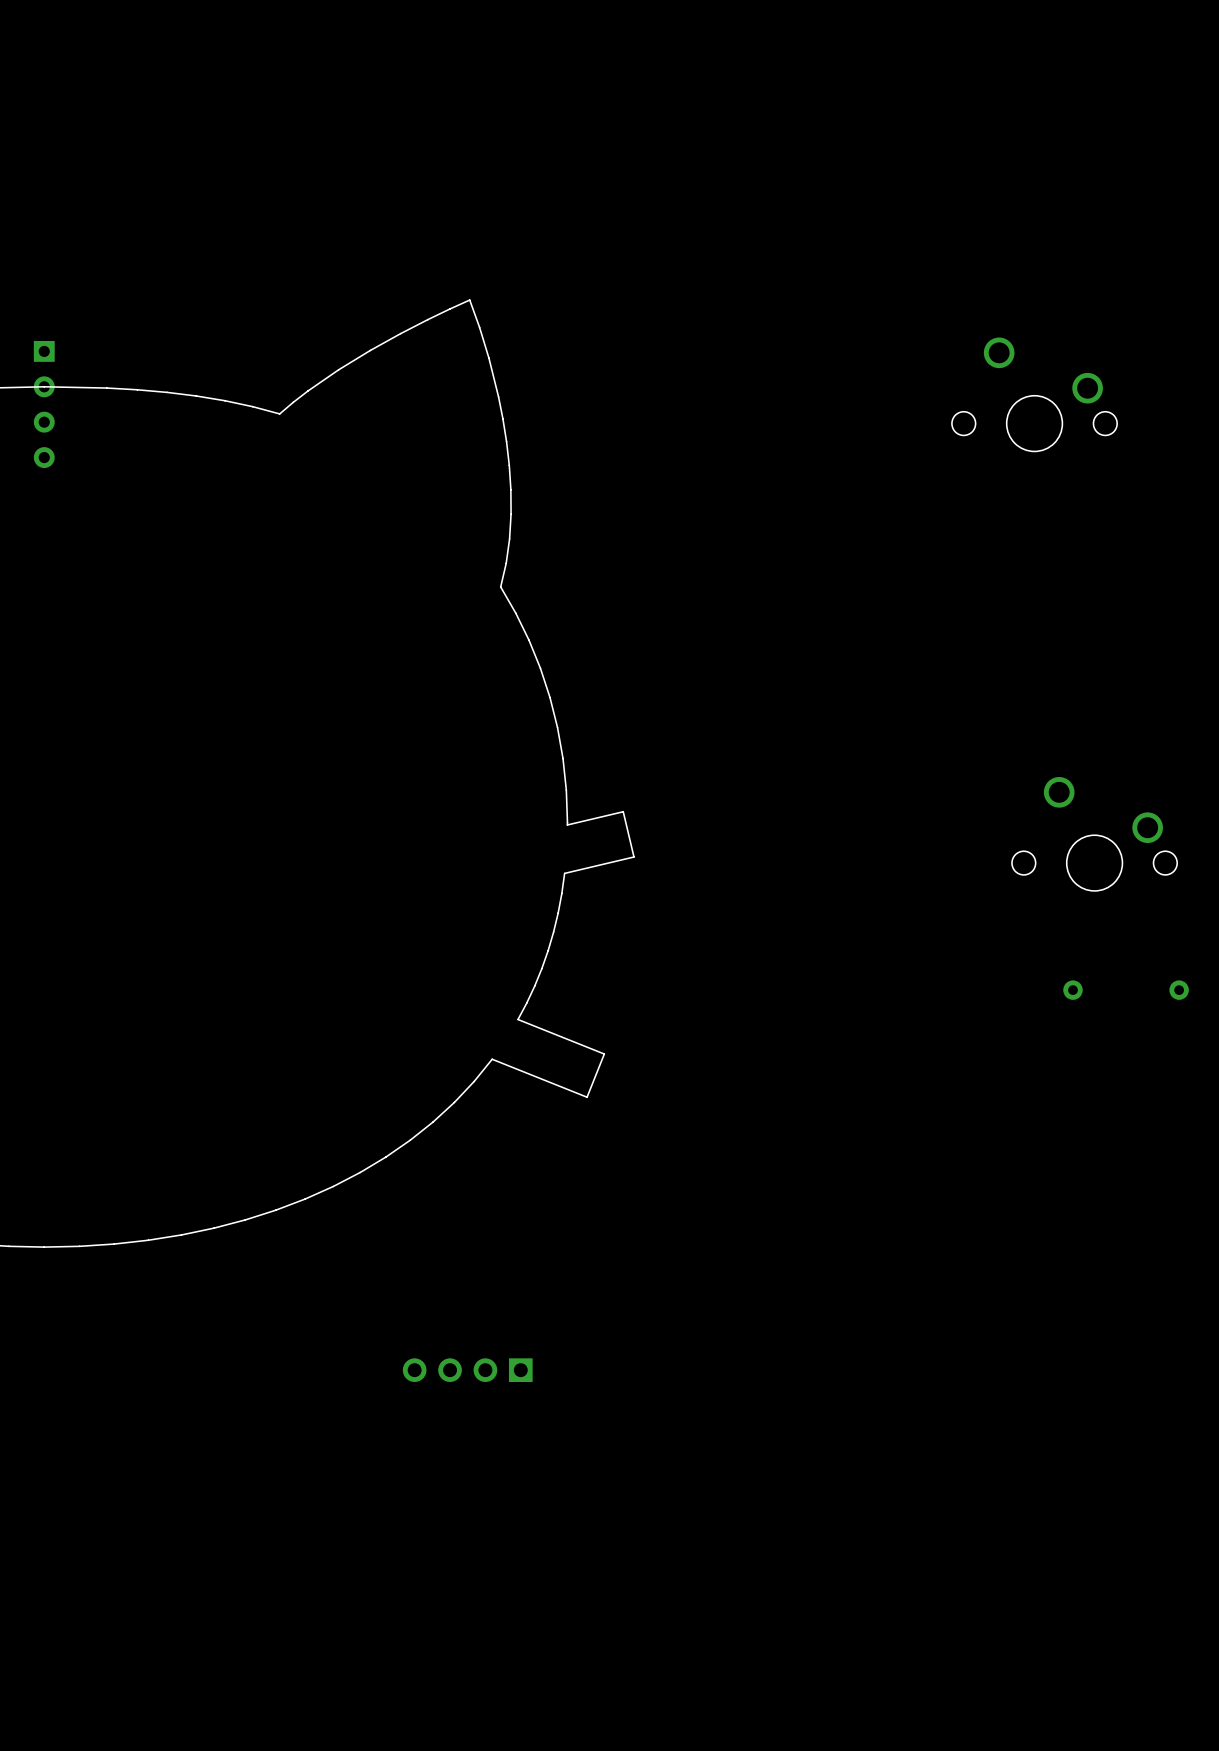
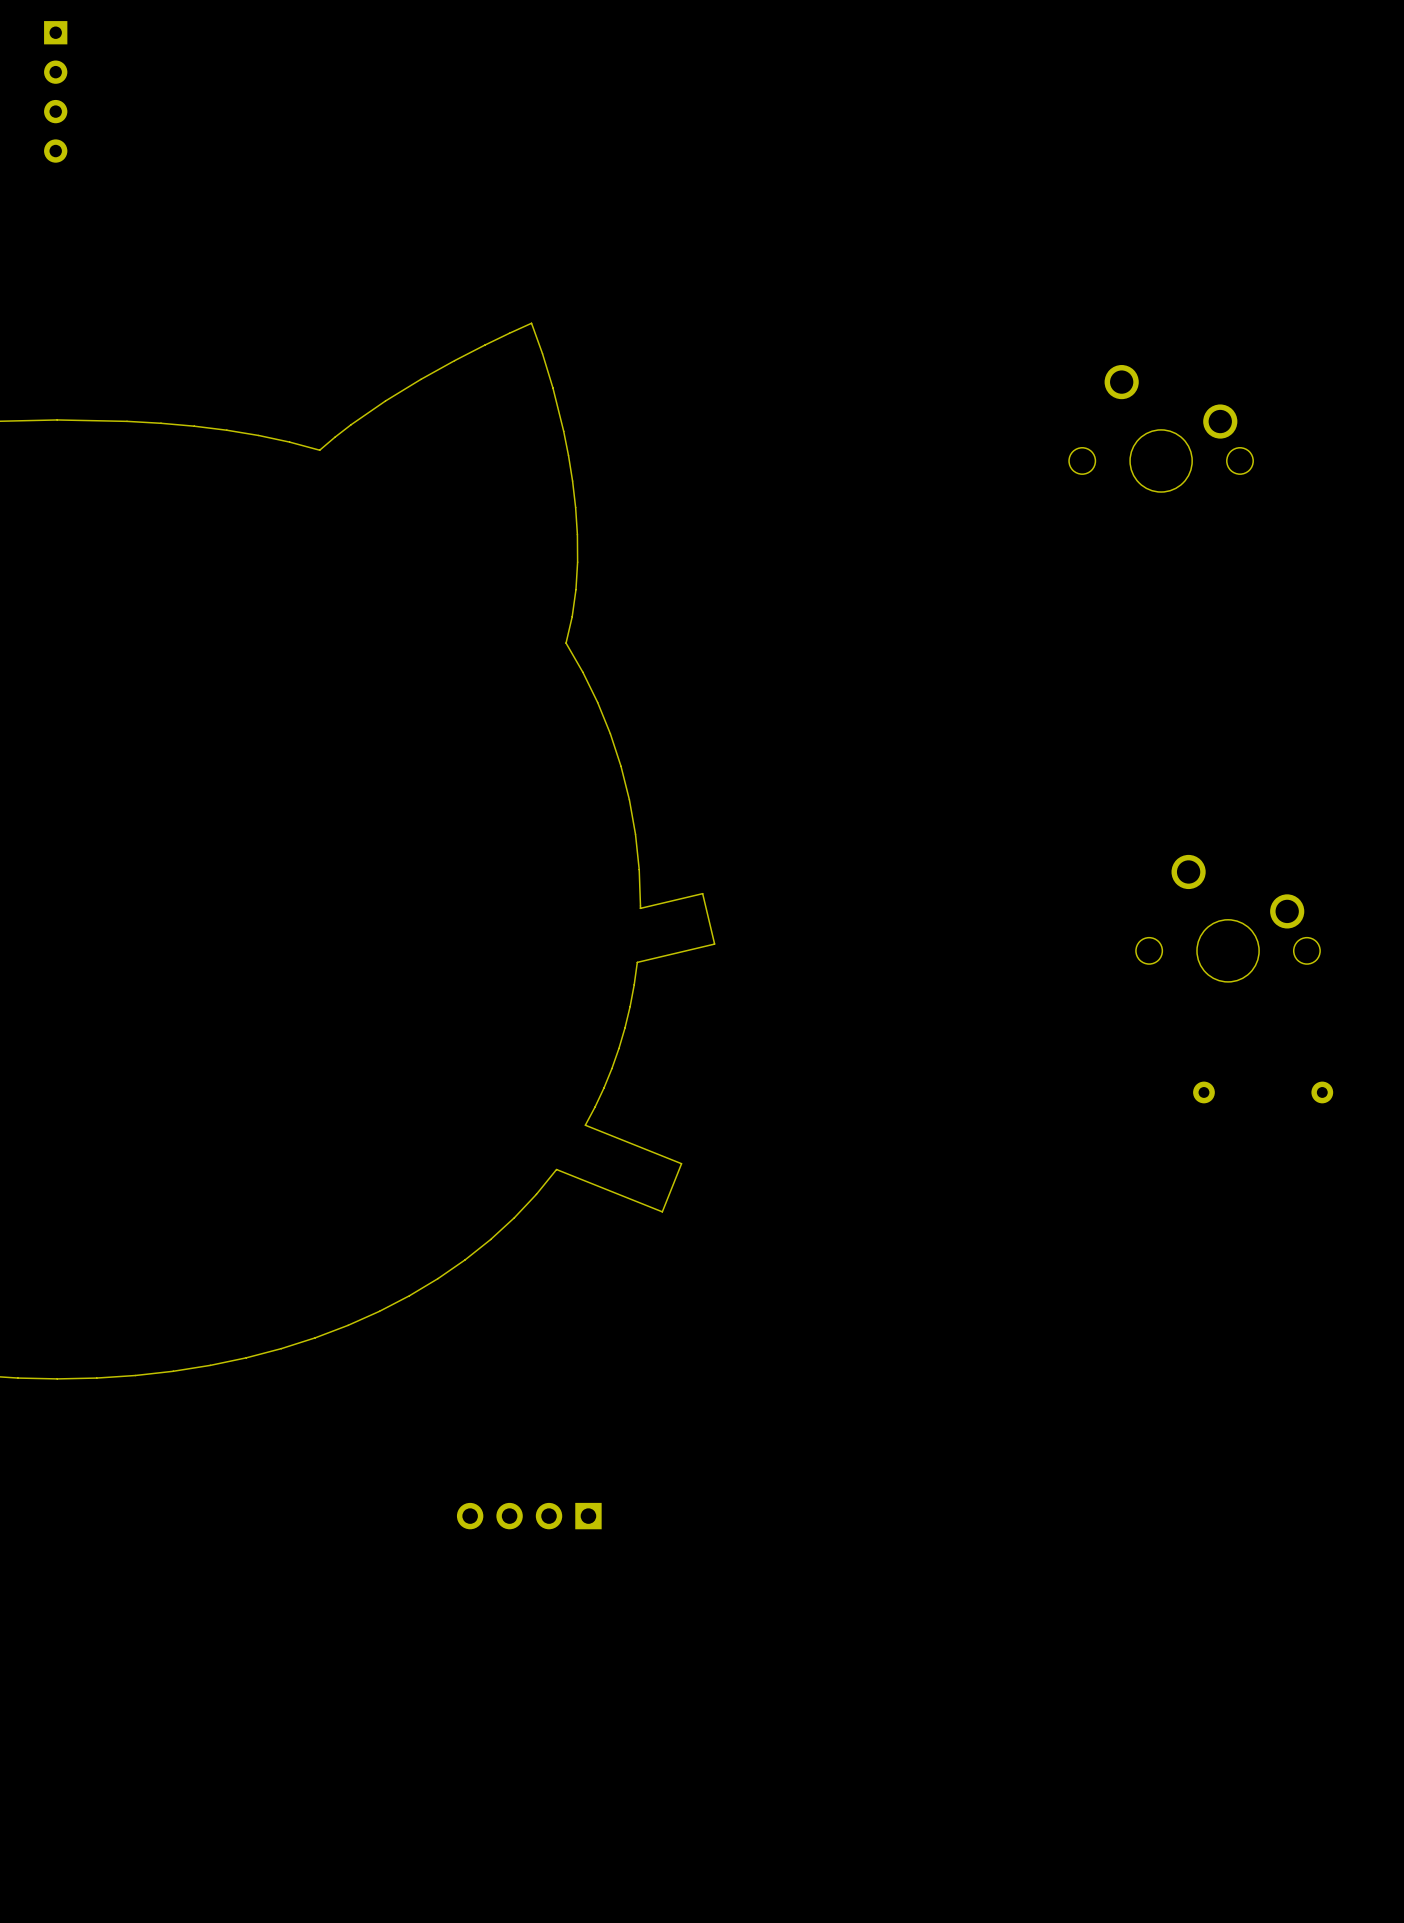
part position: (44, 404) -> (55, 91)

